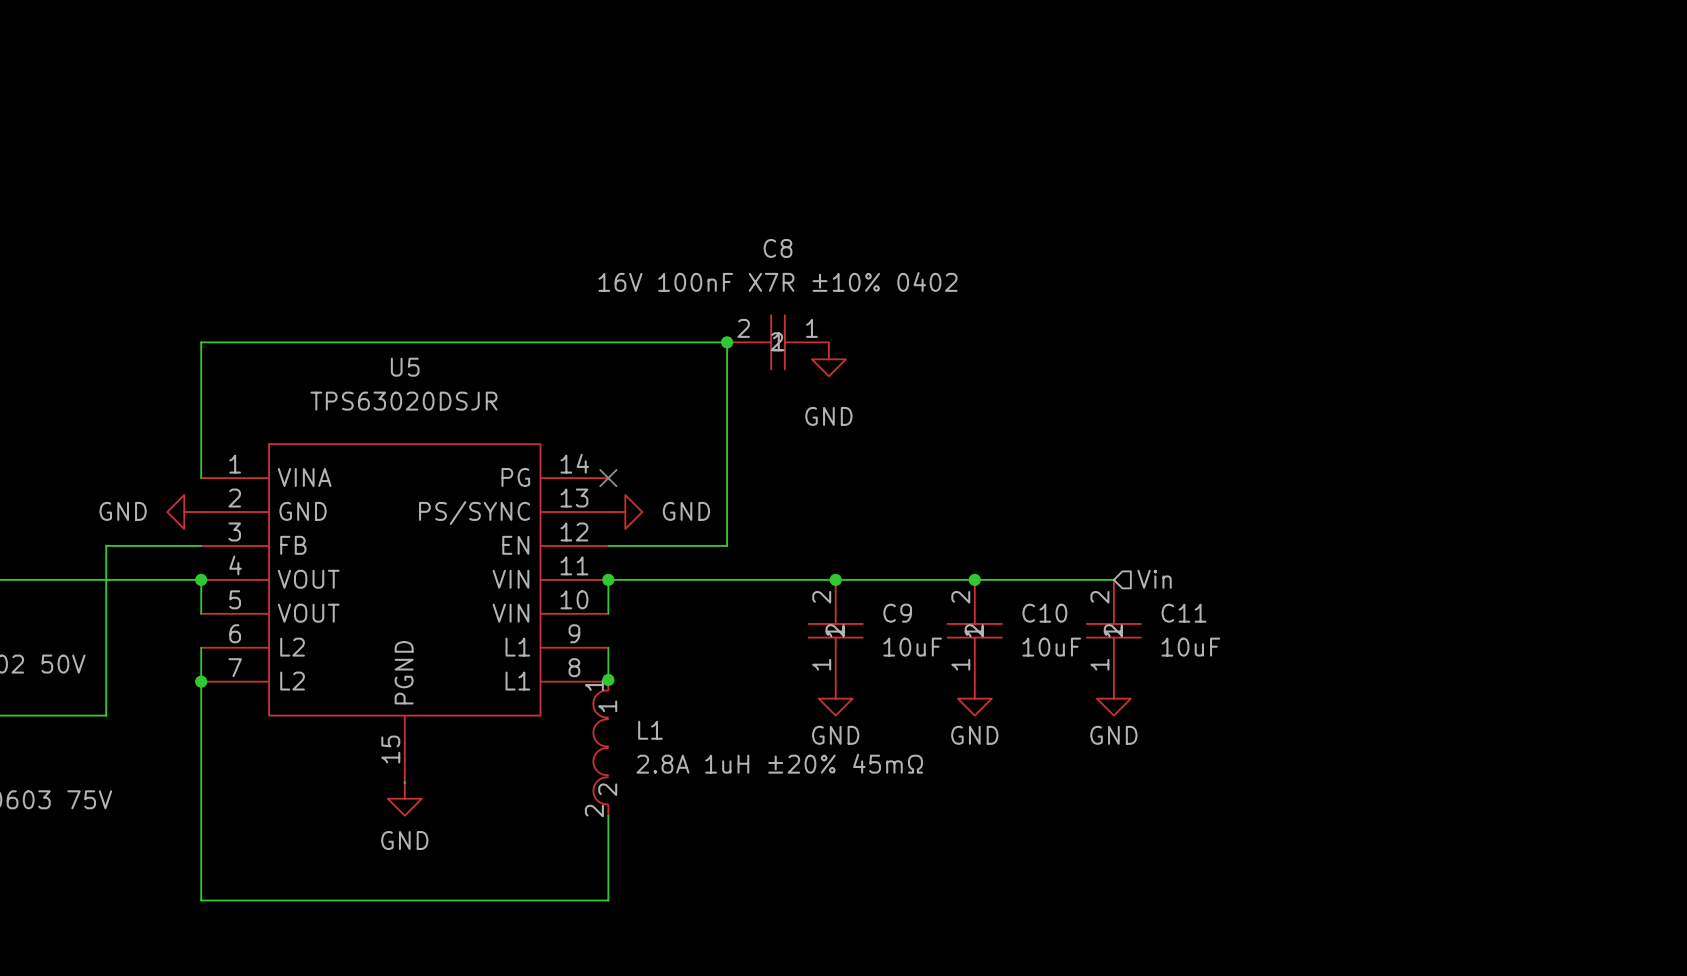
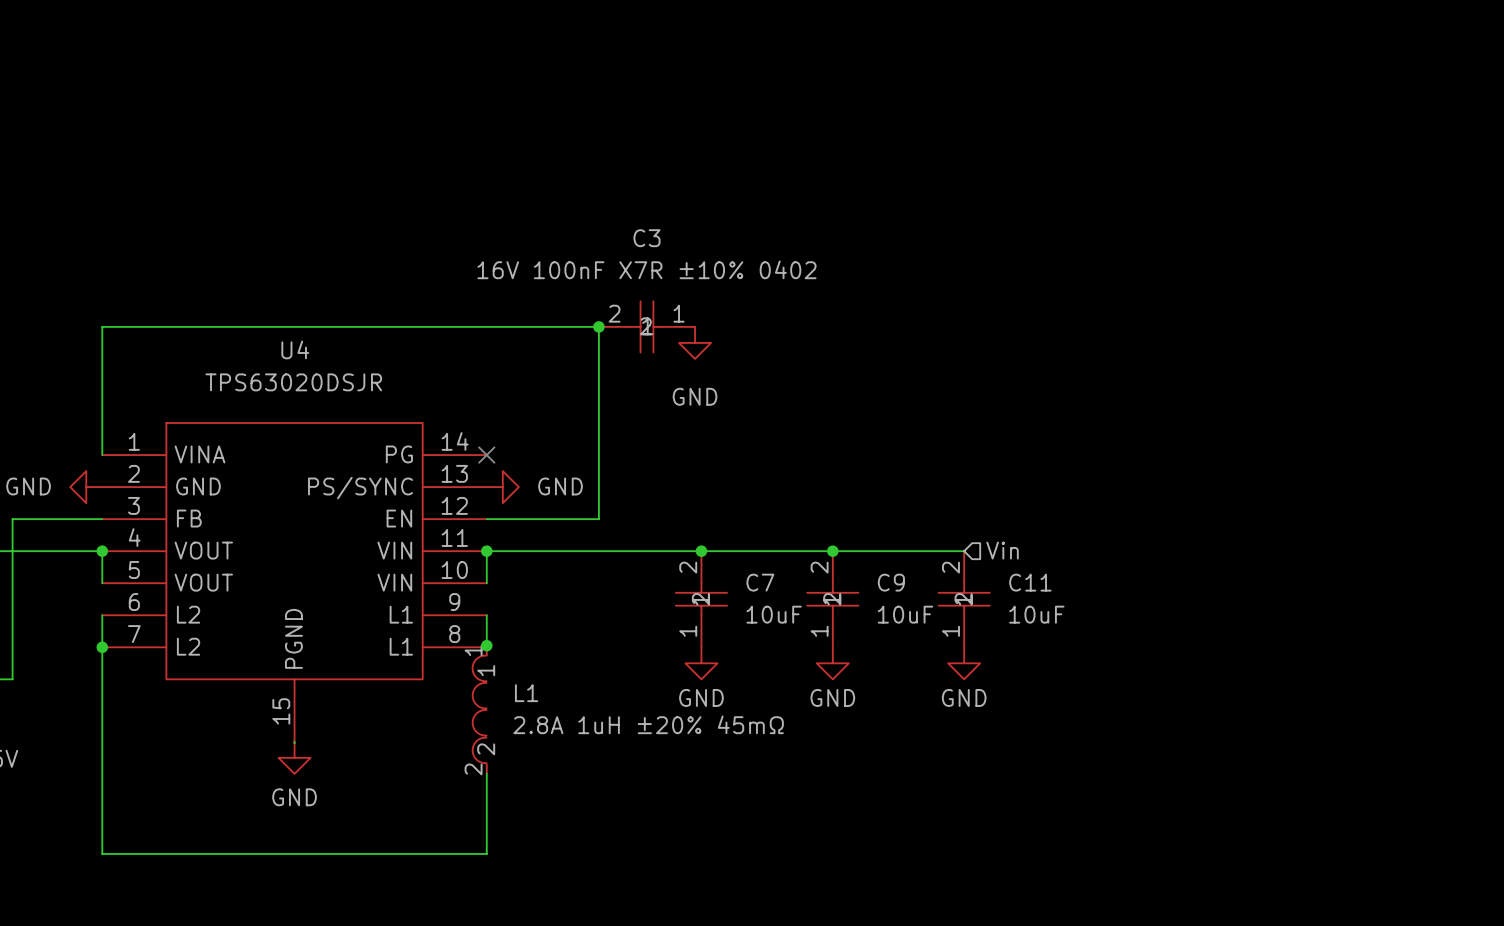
C8 name: C8 (778, 248) -> C3 (646, 238)
U5 name: U5 (405, 367) -> U4 (295, 349)
C9 name: C9 (897, 613) -> C7 (760, 582)
C10 name: C10 (1044, 613) -> C9 (891, 582)

